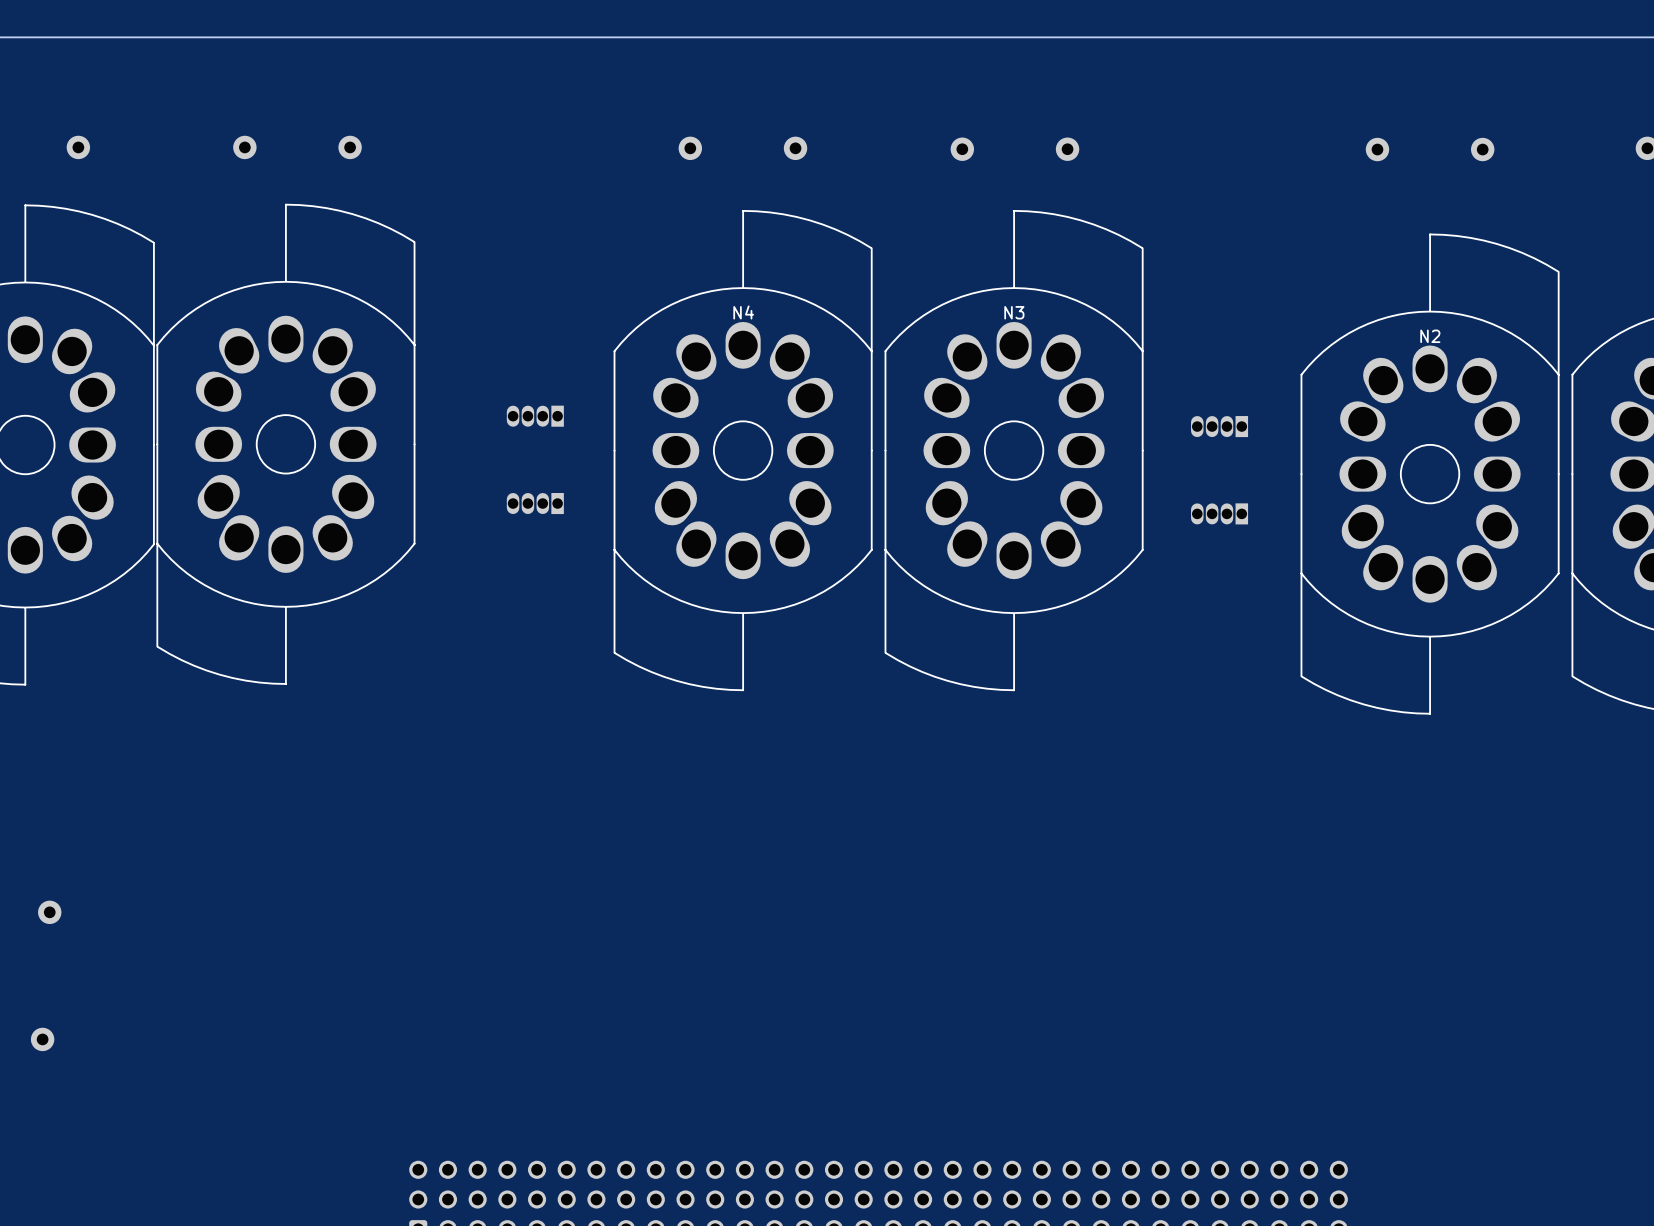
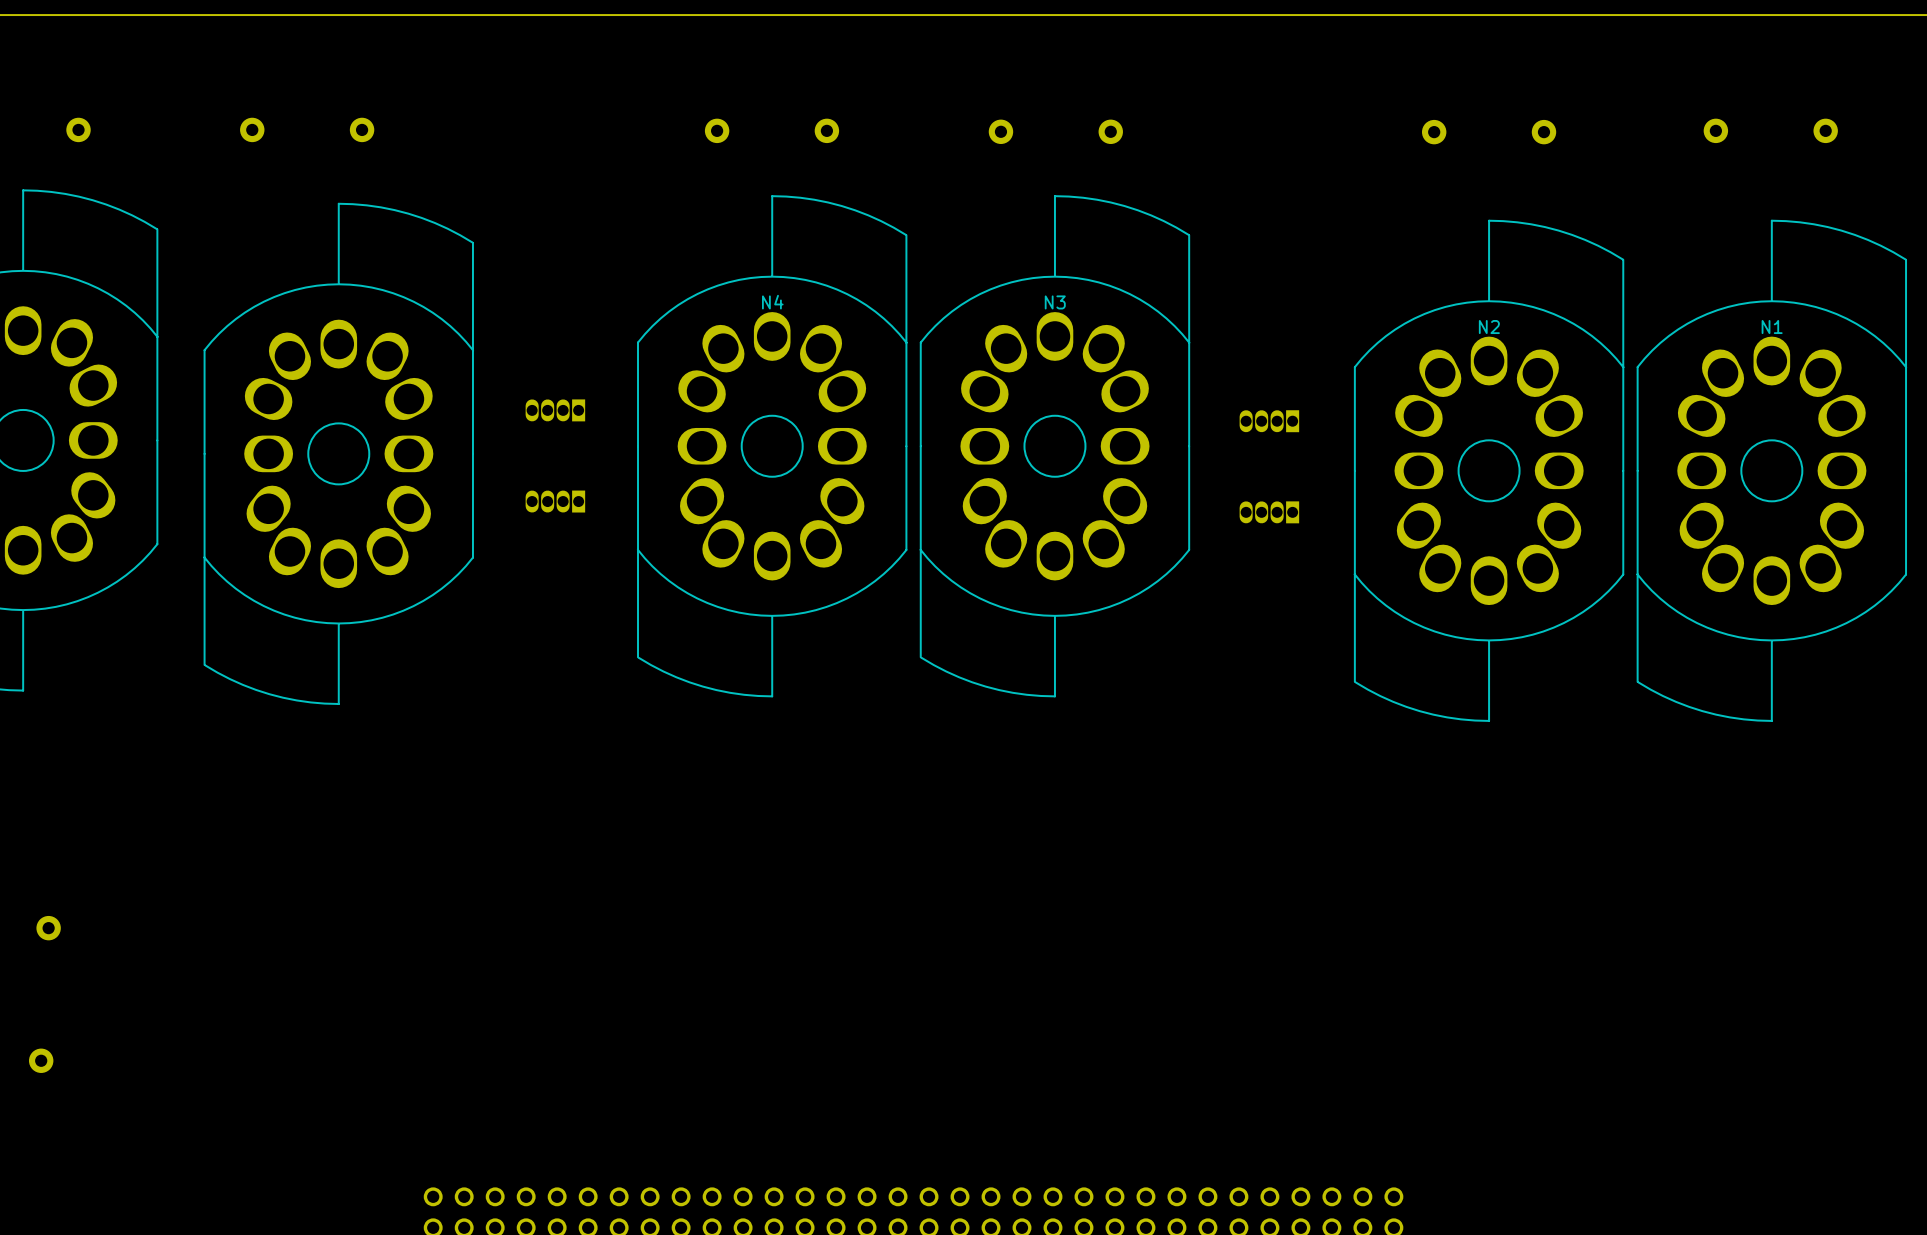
part position: (285, 444) -> (338, 453)

